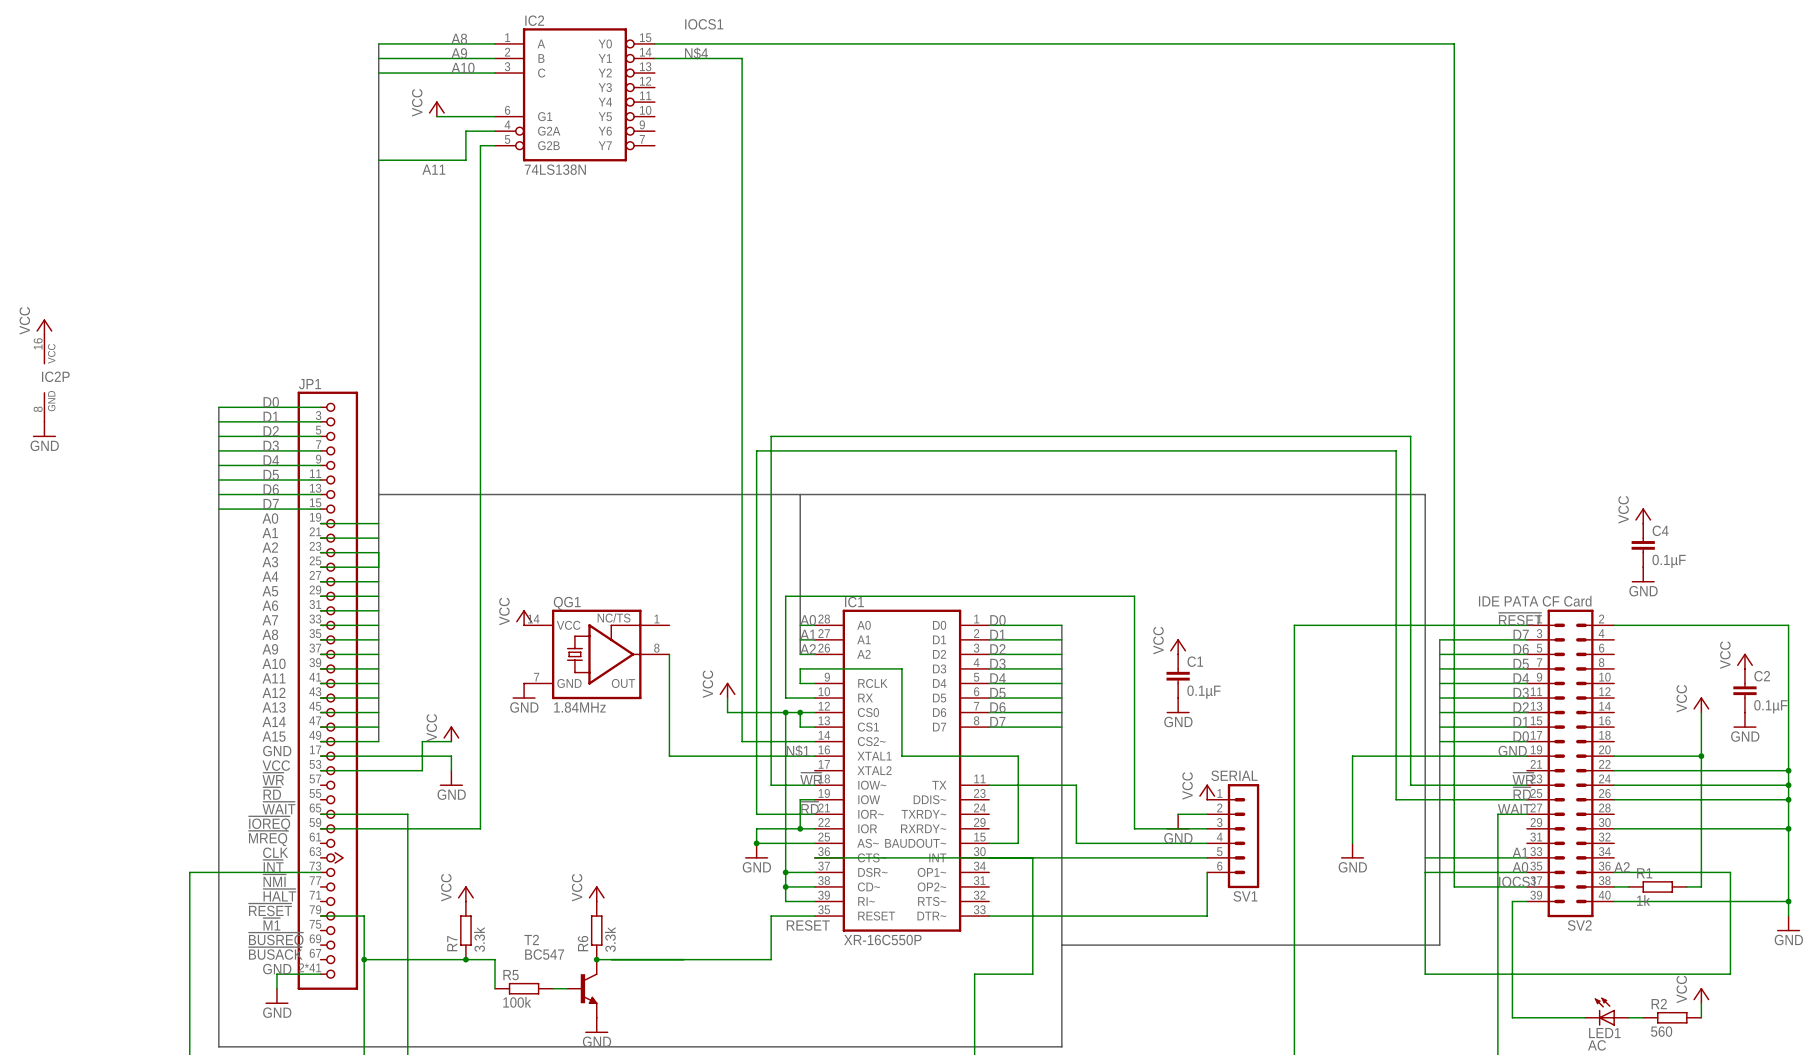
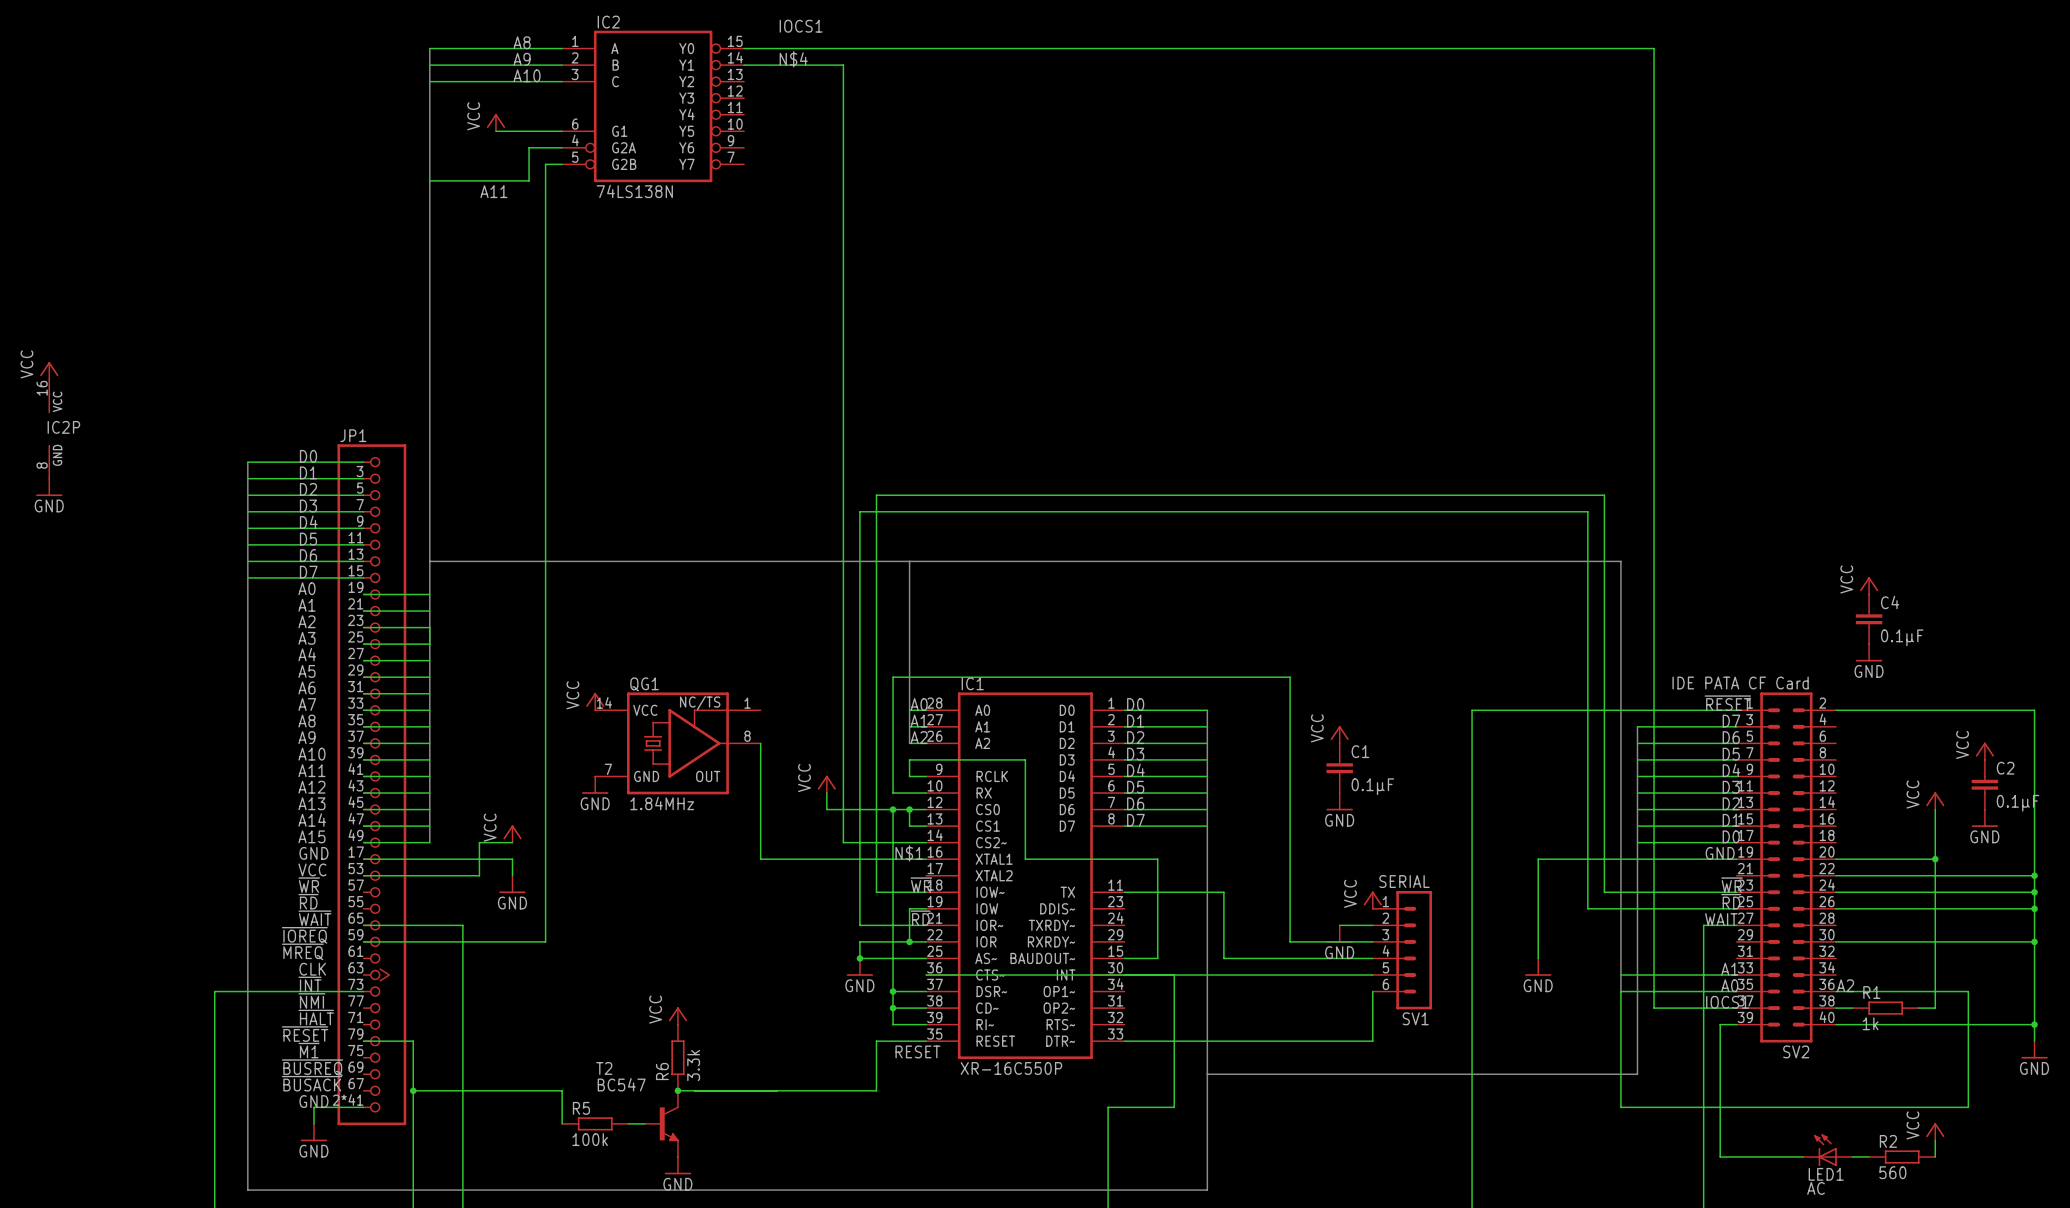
power symbol: VCC (465, 893) -> none
R7: 3.3k (465, 930) -> none
junction: (465, 959) -> none

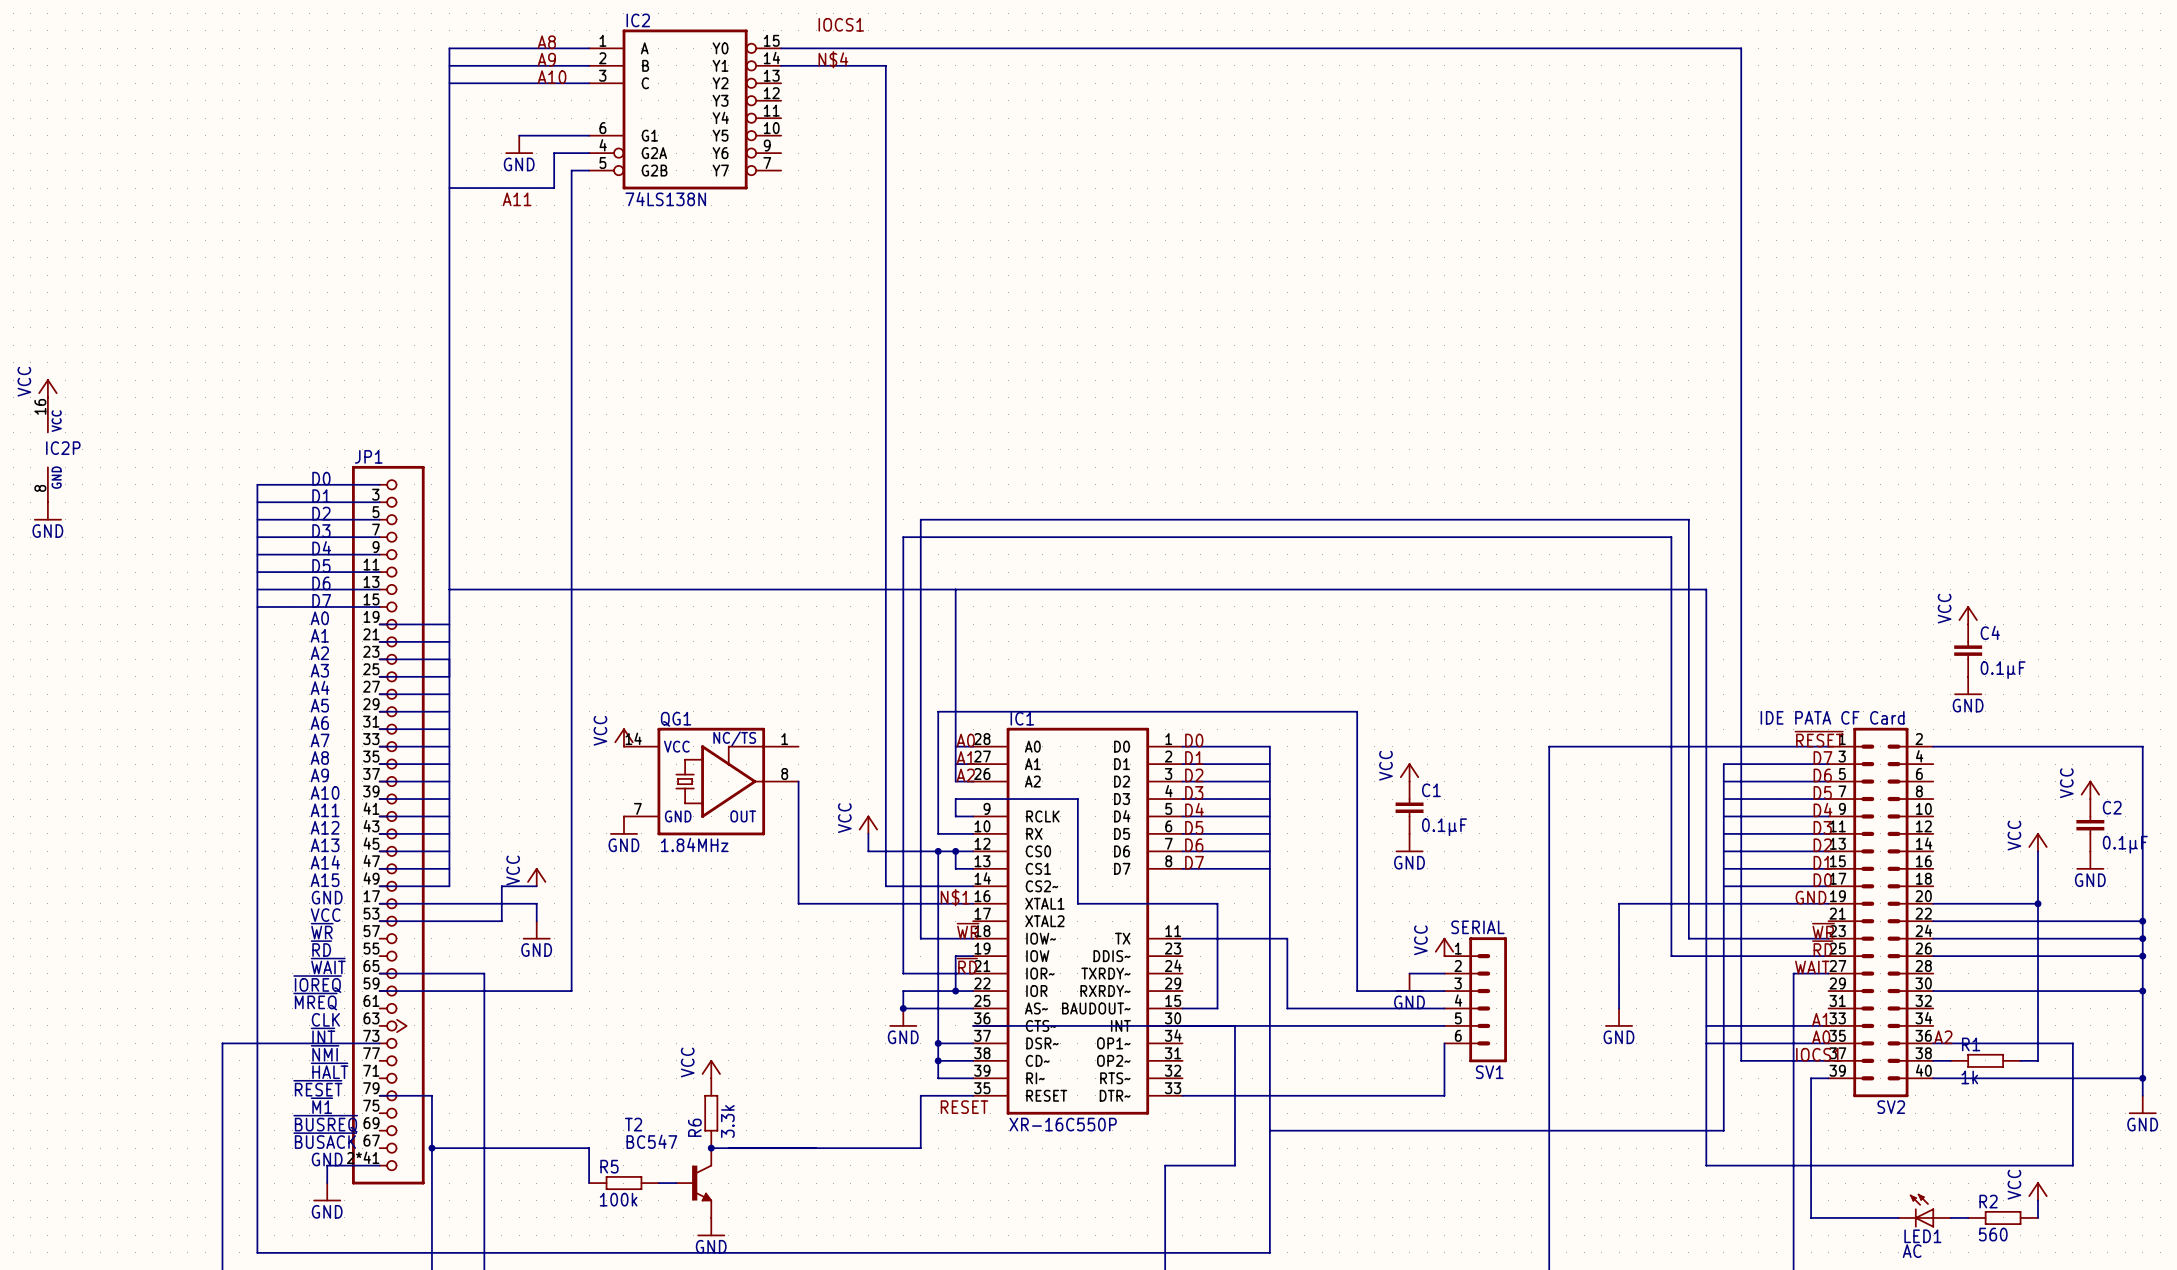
power symbol: VCC (495, 122) -> none
power symbol: none -> GND (519, 144)

